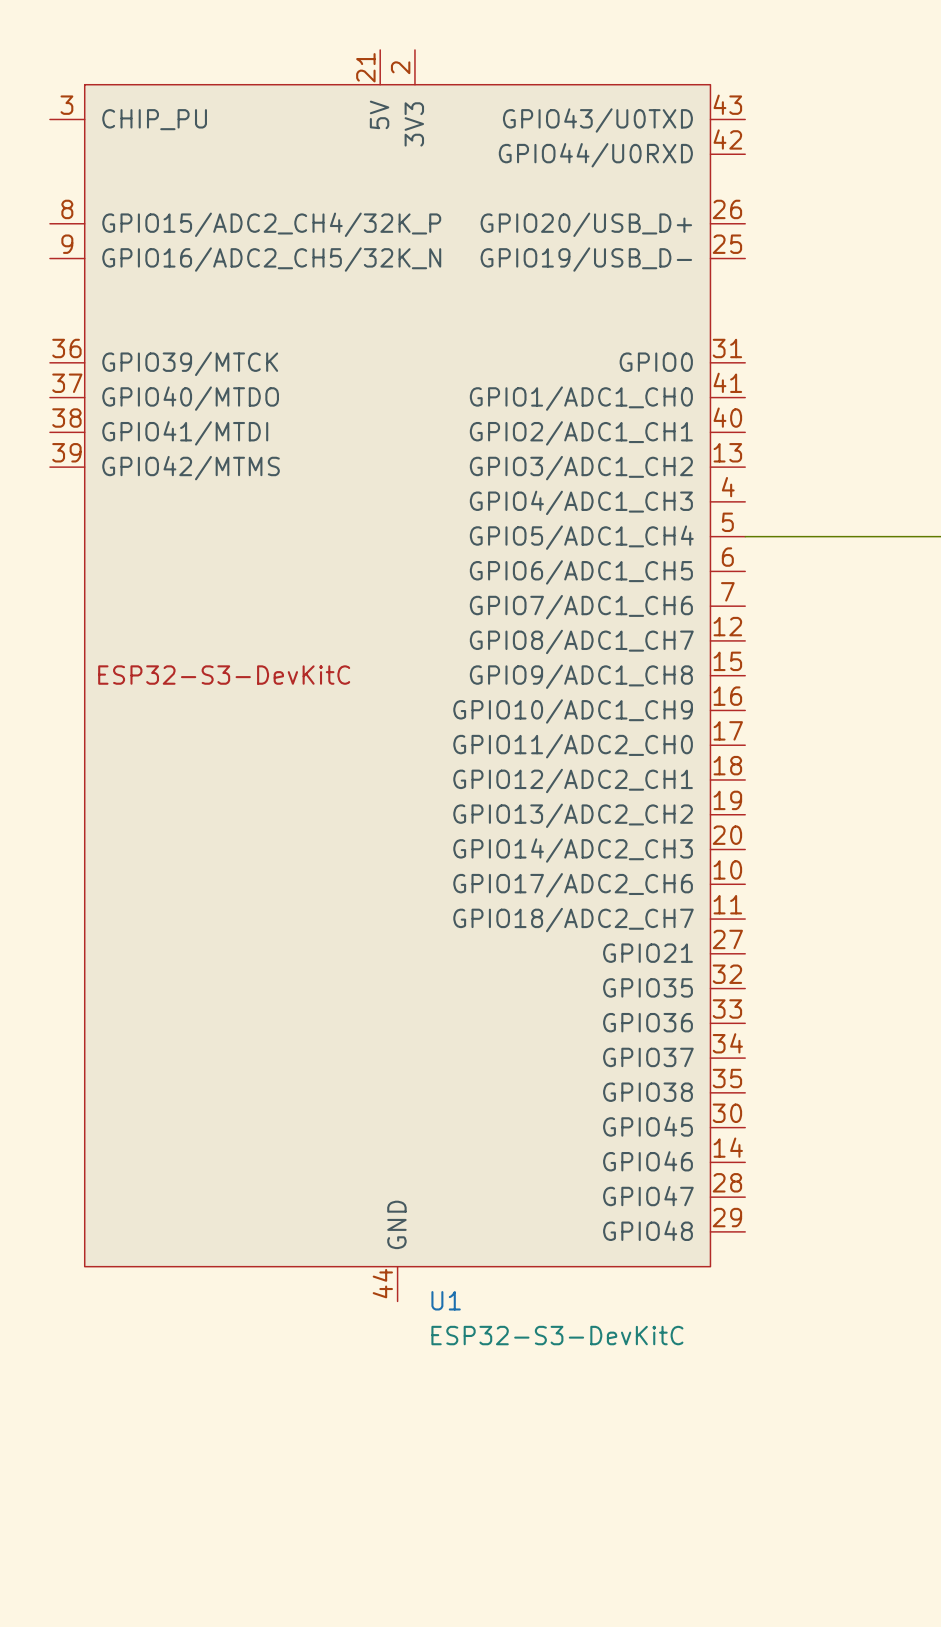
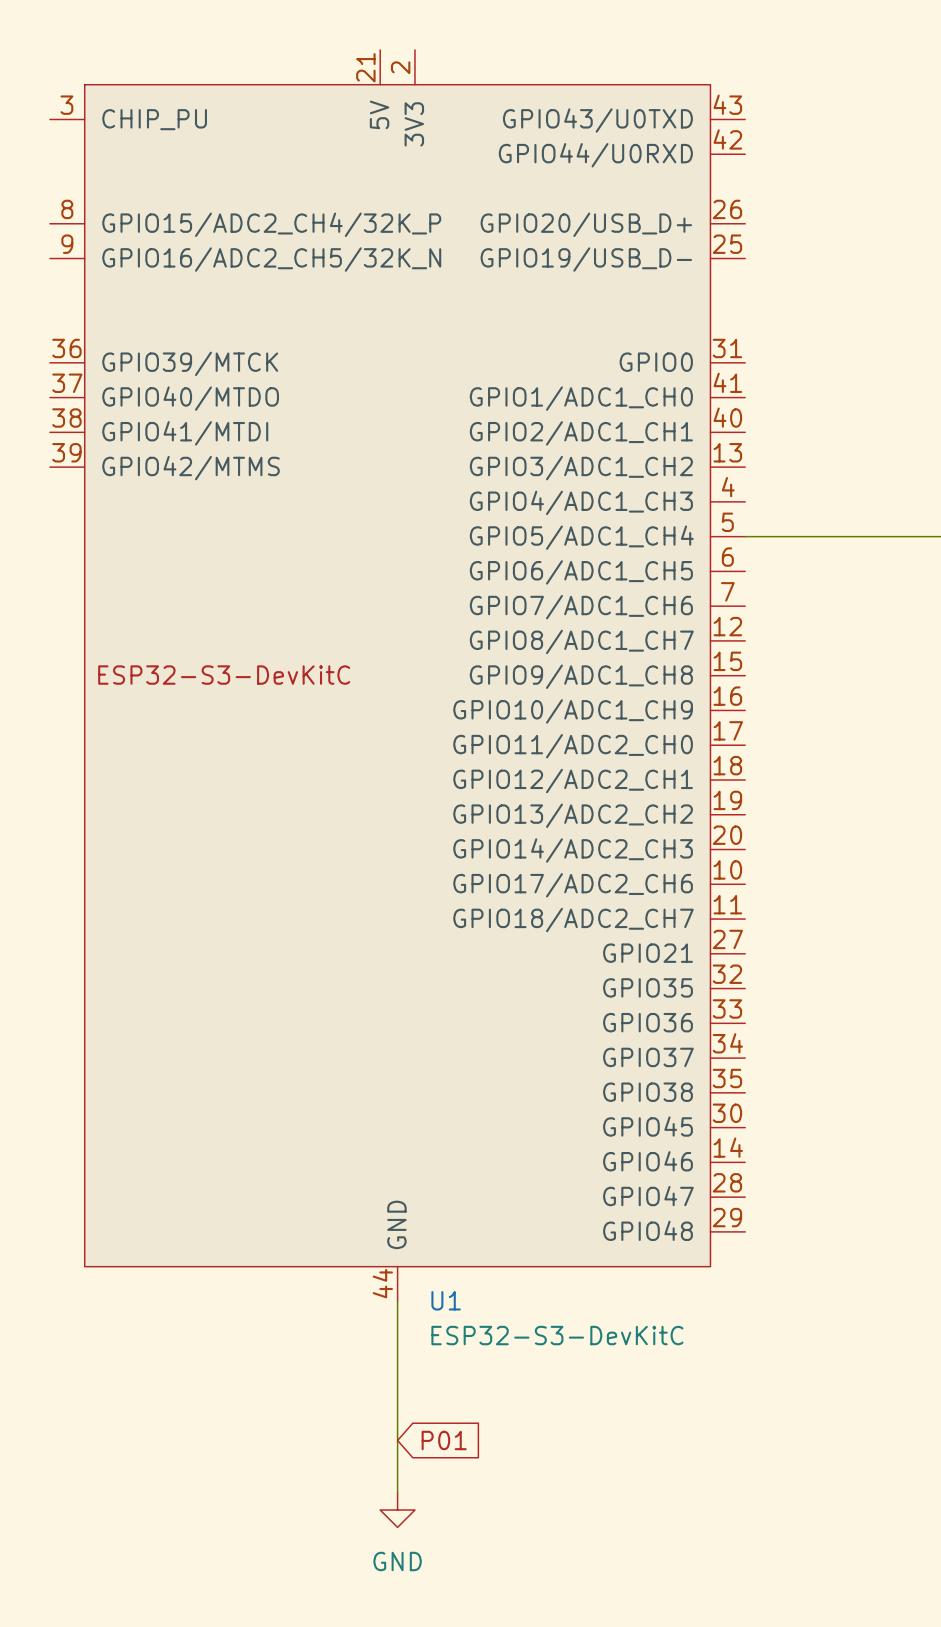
wire: none -> (397, 1301) (397, 1492)
global label: none -> P01 (444, 1440)
power symbol: none -> GND (397, 1510)

